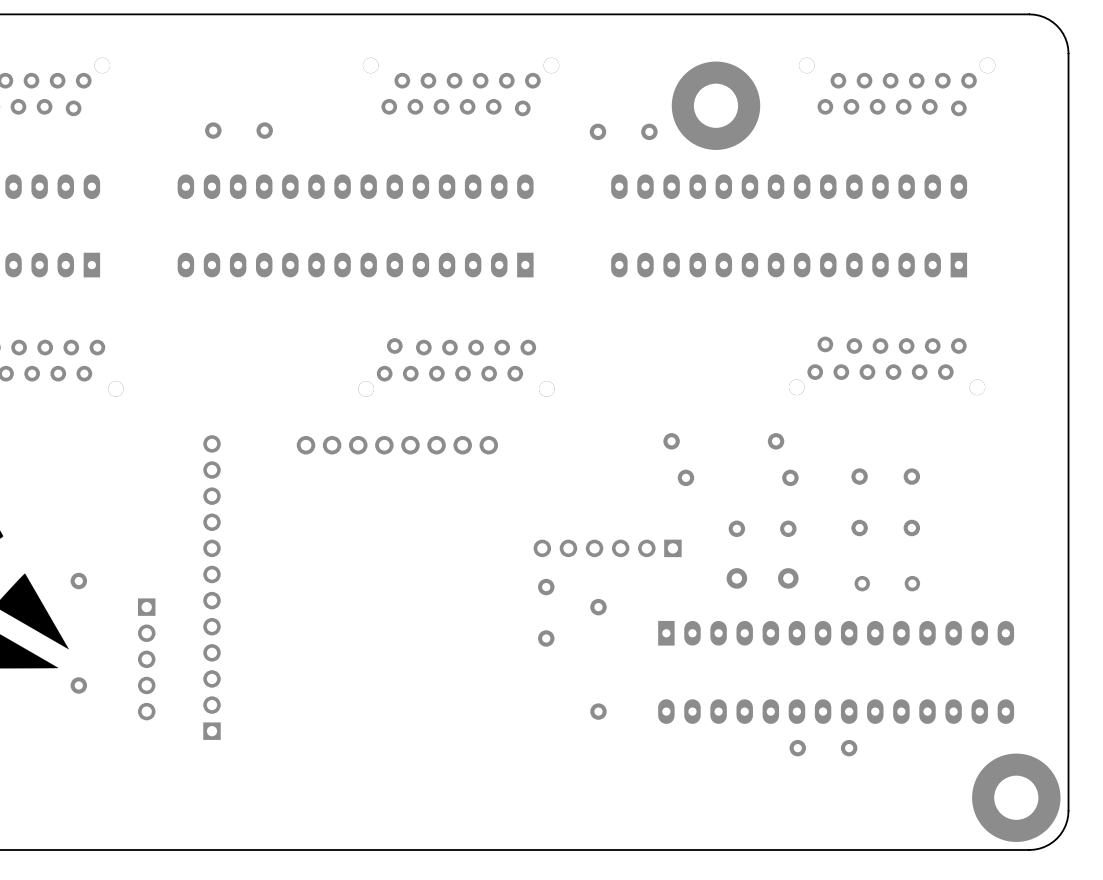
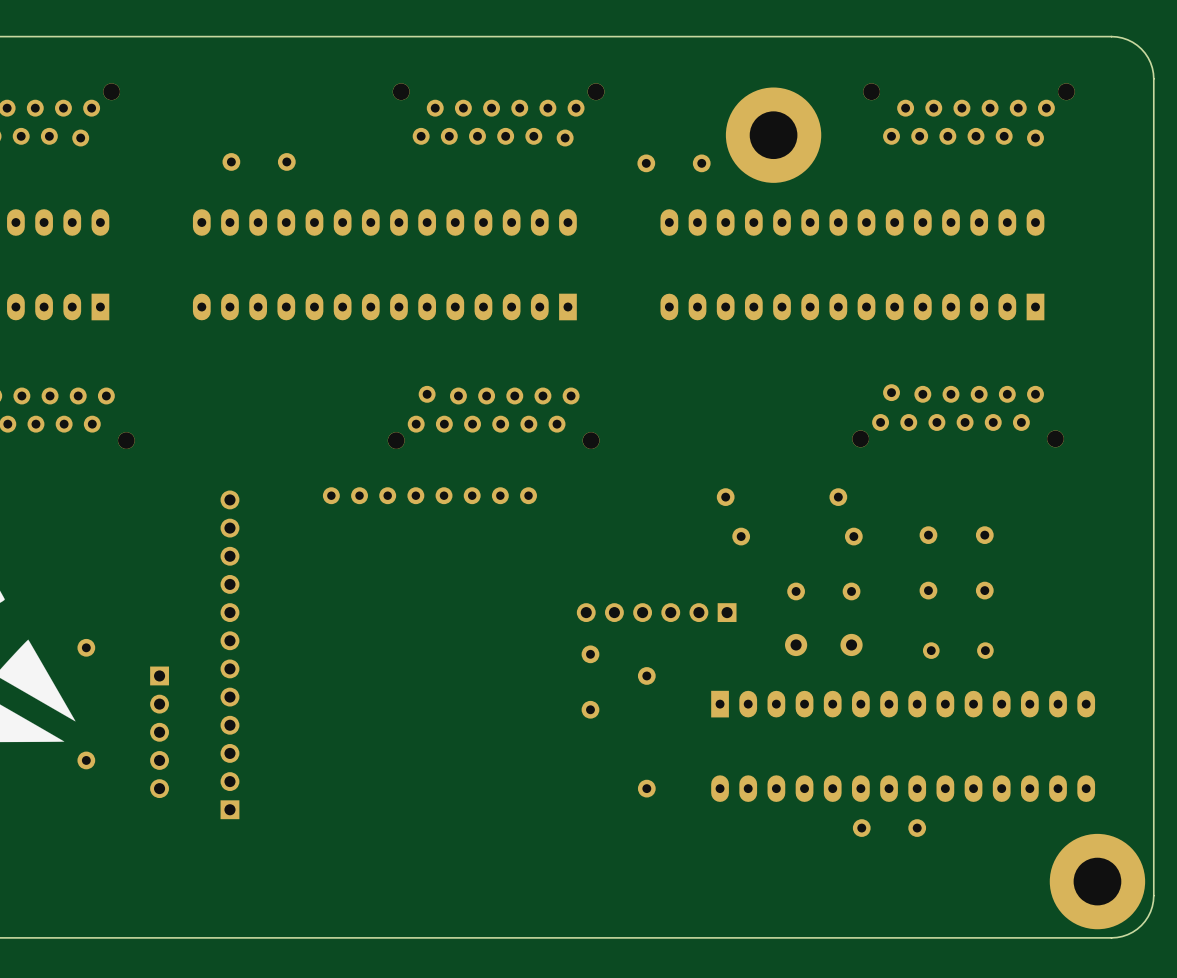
part footprint: [296, 435, 499, 455] -> [322, 487, 537, 505]

